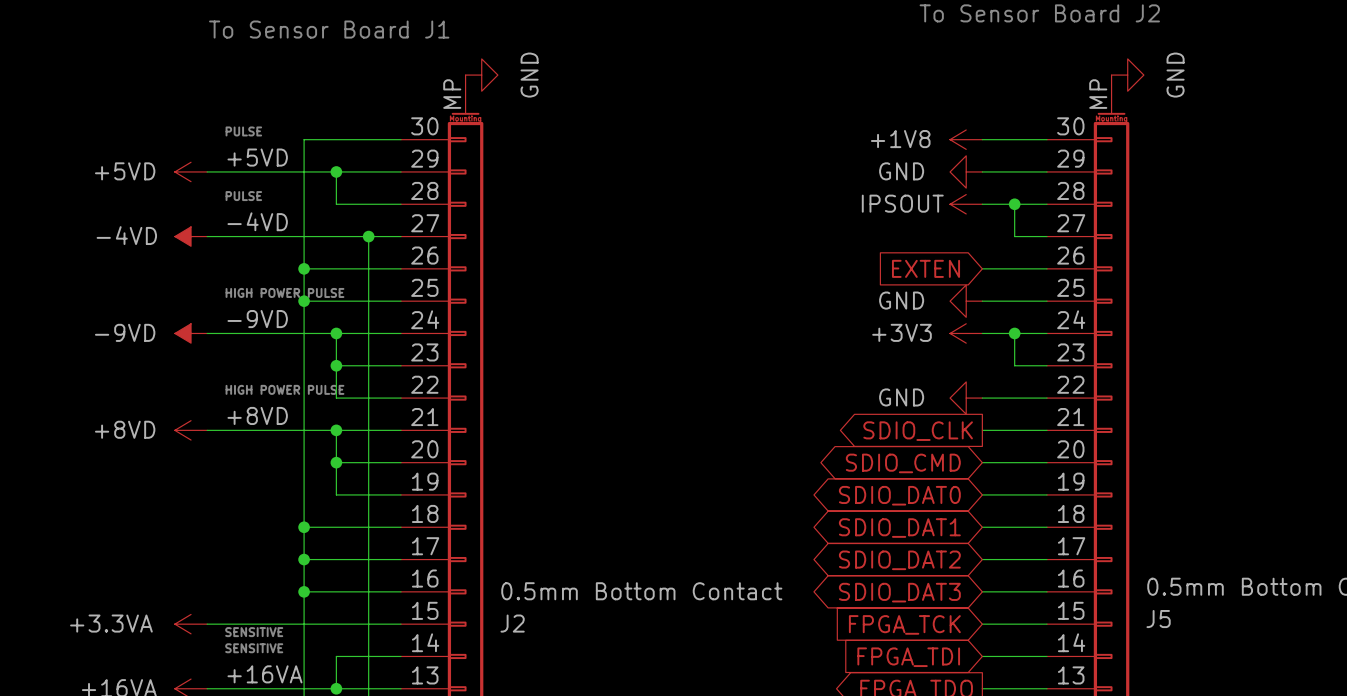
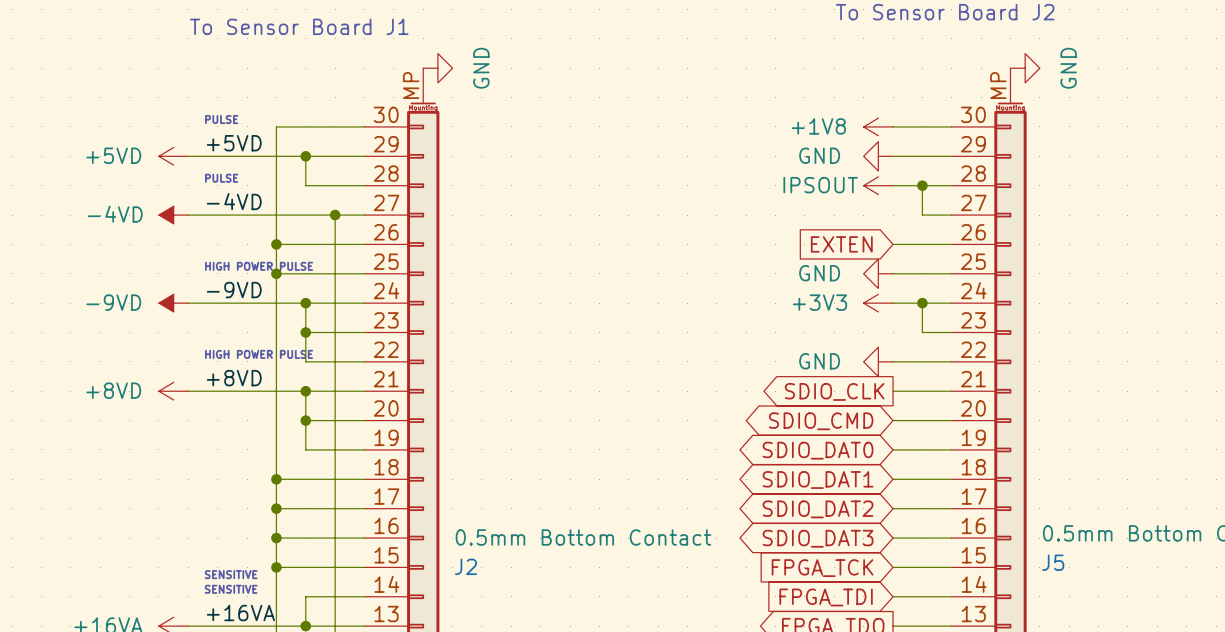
power symbol: +3.3VA (191, 624) -> none
wire: (207, 624) (304, 624) -> none
junction: none -> (276, 567)

